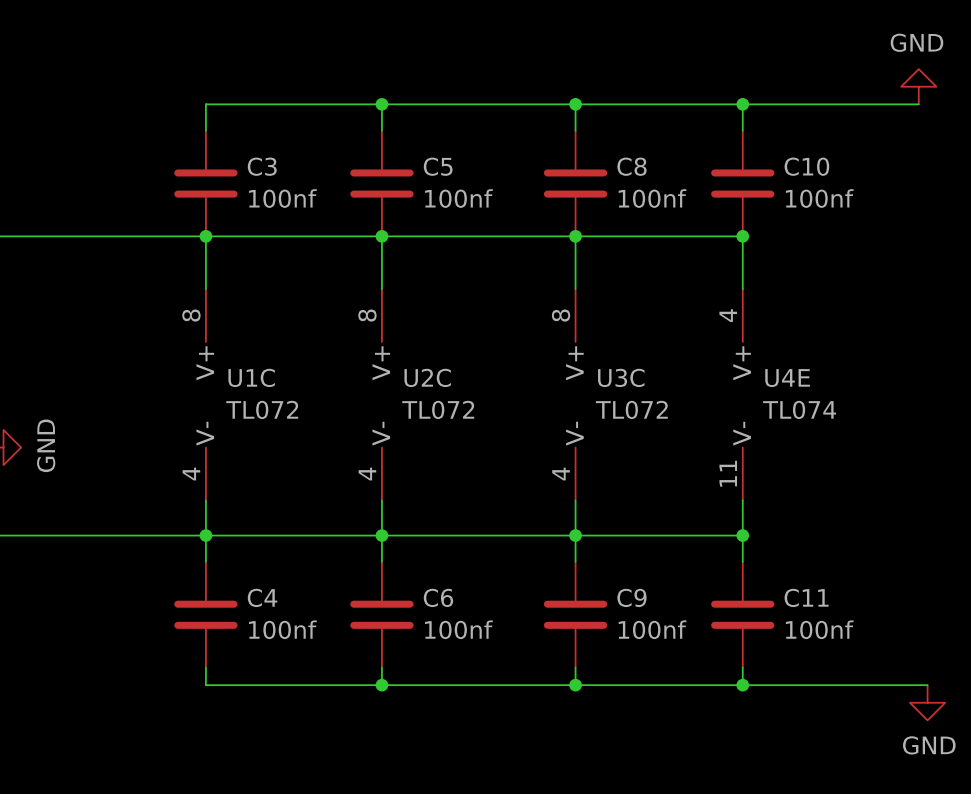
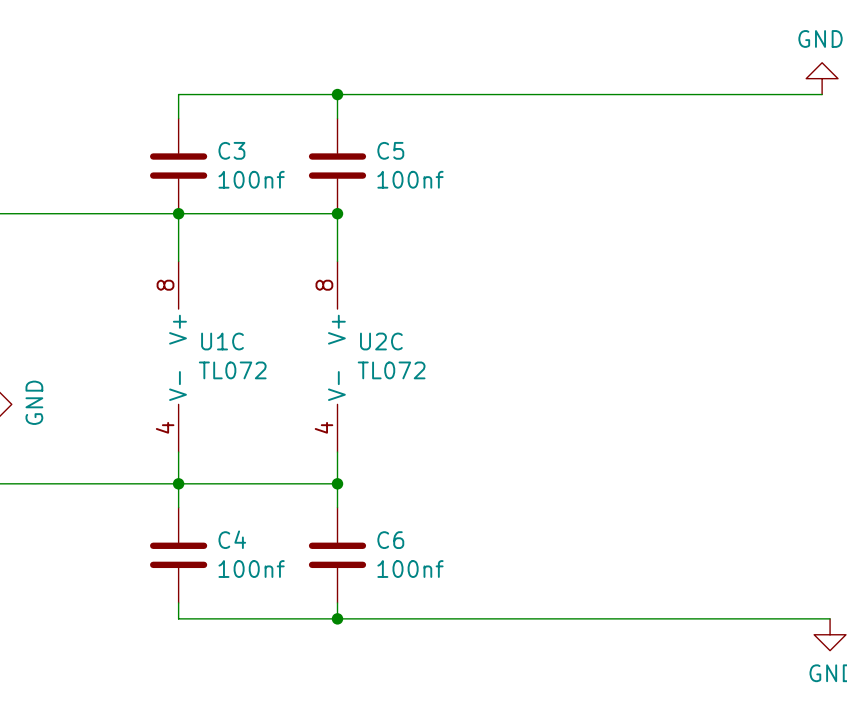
wire: (575, 104) (575, 130) -> none
junction: (575, 104) -> none
wire: (742, 104) (742, 130) -> none
junction: (742, 104) -> none
C8: 100nf (575, 183) -> none
C10: 100nf (742, 183) -> none
wire: (381, 236) (742, 236) (742, 289) -> none
wire: (575, 236) (575, 289) -> none
junction: (575, 236) -> none
junction: (742, 236) -> none
U3C: TL072 (575, 394) -> none
U4E: TL074 (742, 394) -> none
wire: (575, 500) (575, 561) -> none
wire: (742, 500) (742, 561) -> none
wire: (381, 535) (742, 535) -> none
junction: (575, 535) -> none
junction: (742, 535) -> none
C9: 100nf (575, 614) -> none
C11: 100nf (742, 614) -> none
wire: (575, 667) (575, 685) -> none
wire: (742, 667) (742, 685) -> none
junction: (575, 685) -> none
junction: (742, 685) -> none

